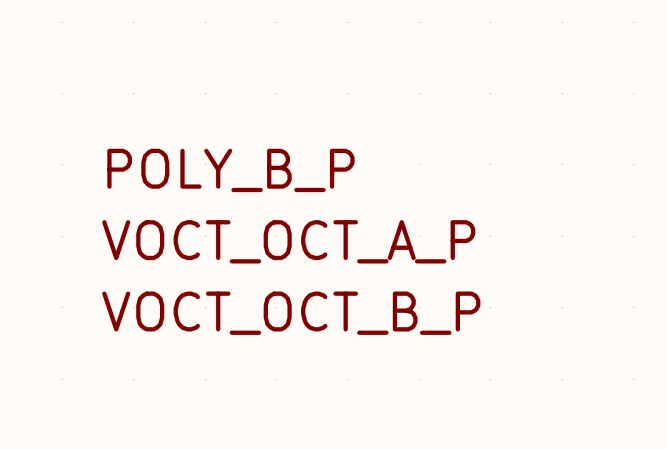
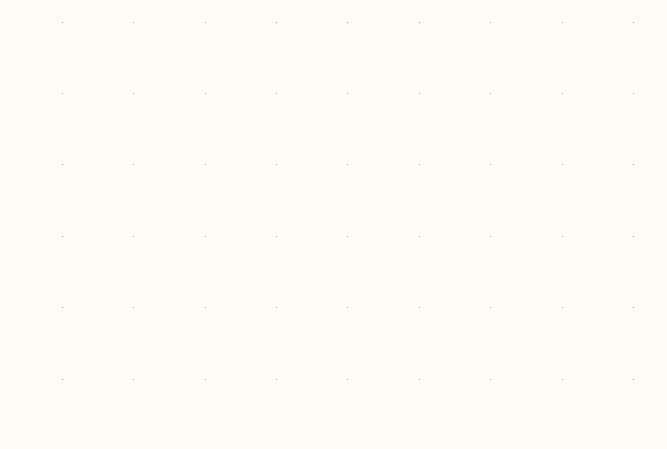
label: POLY_B_P (230, 170) -> none
label: VOCT_OCT_A_P (288, 241) -> none
label: VOCT_OCT_B_P (291, 313) -> none

